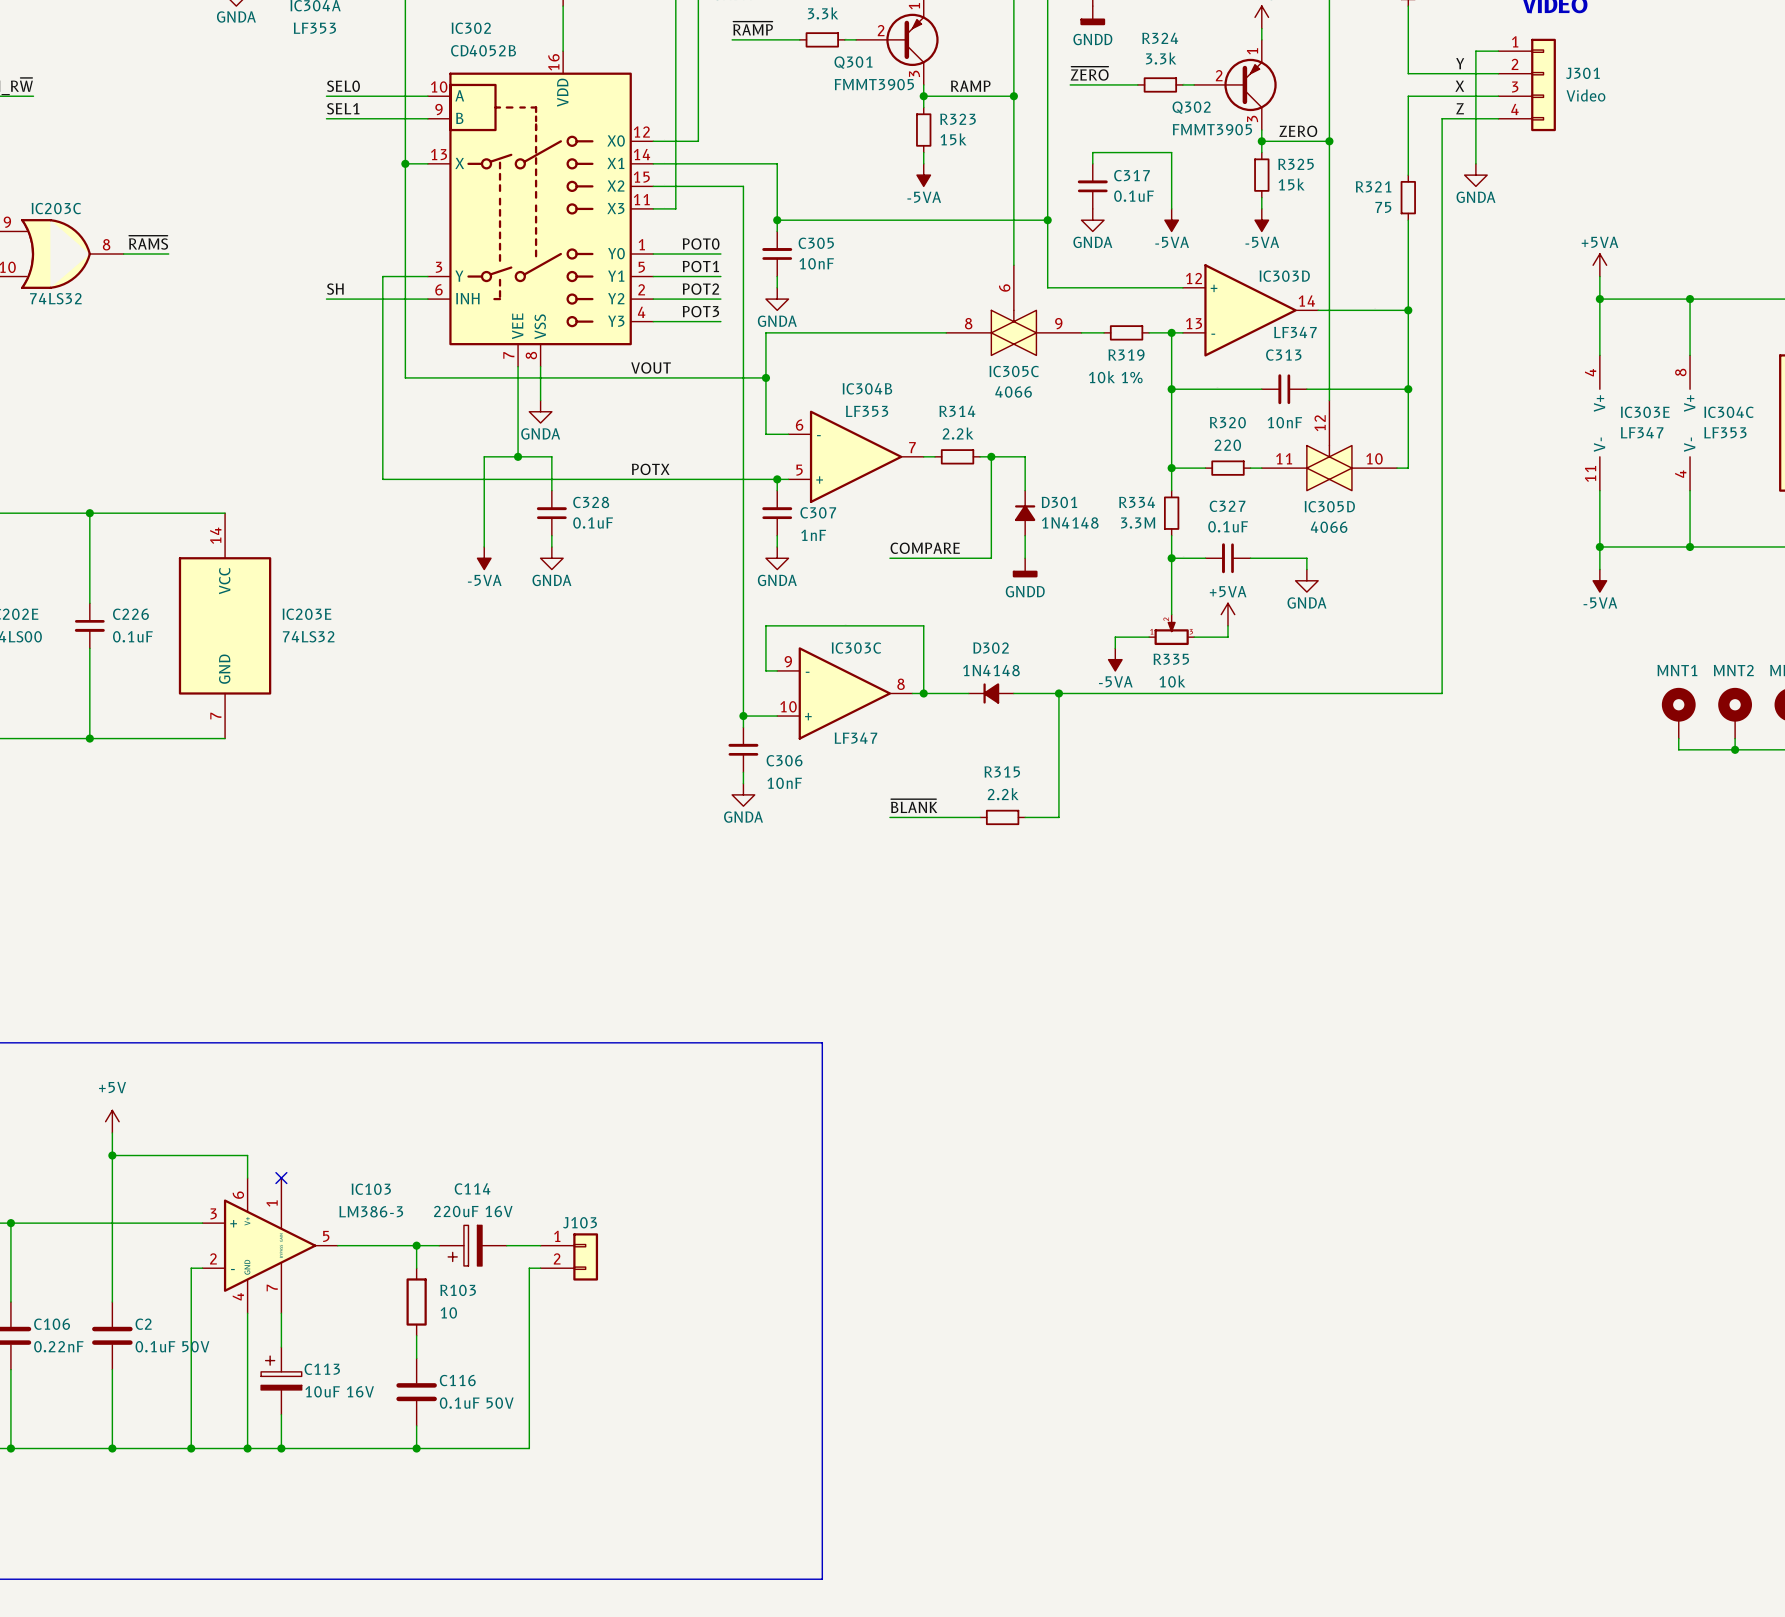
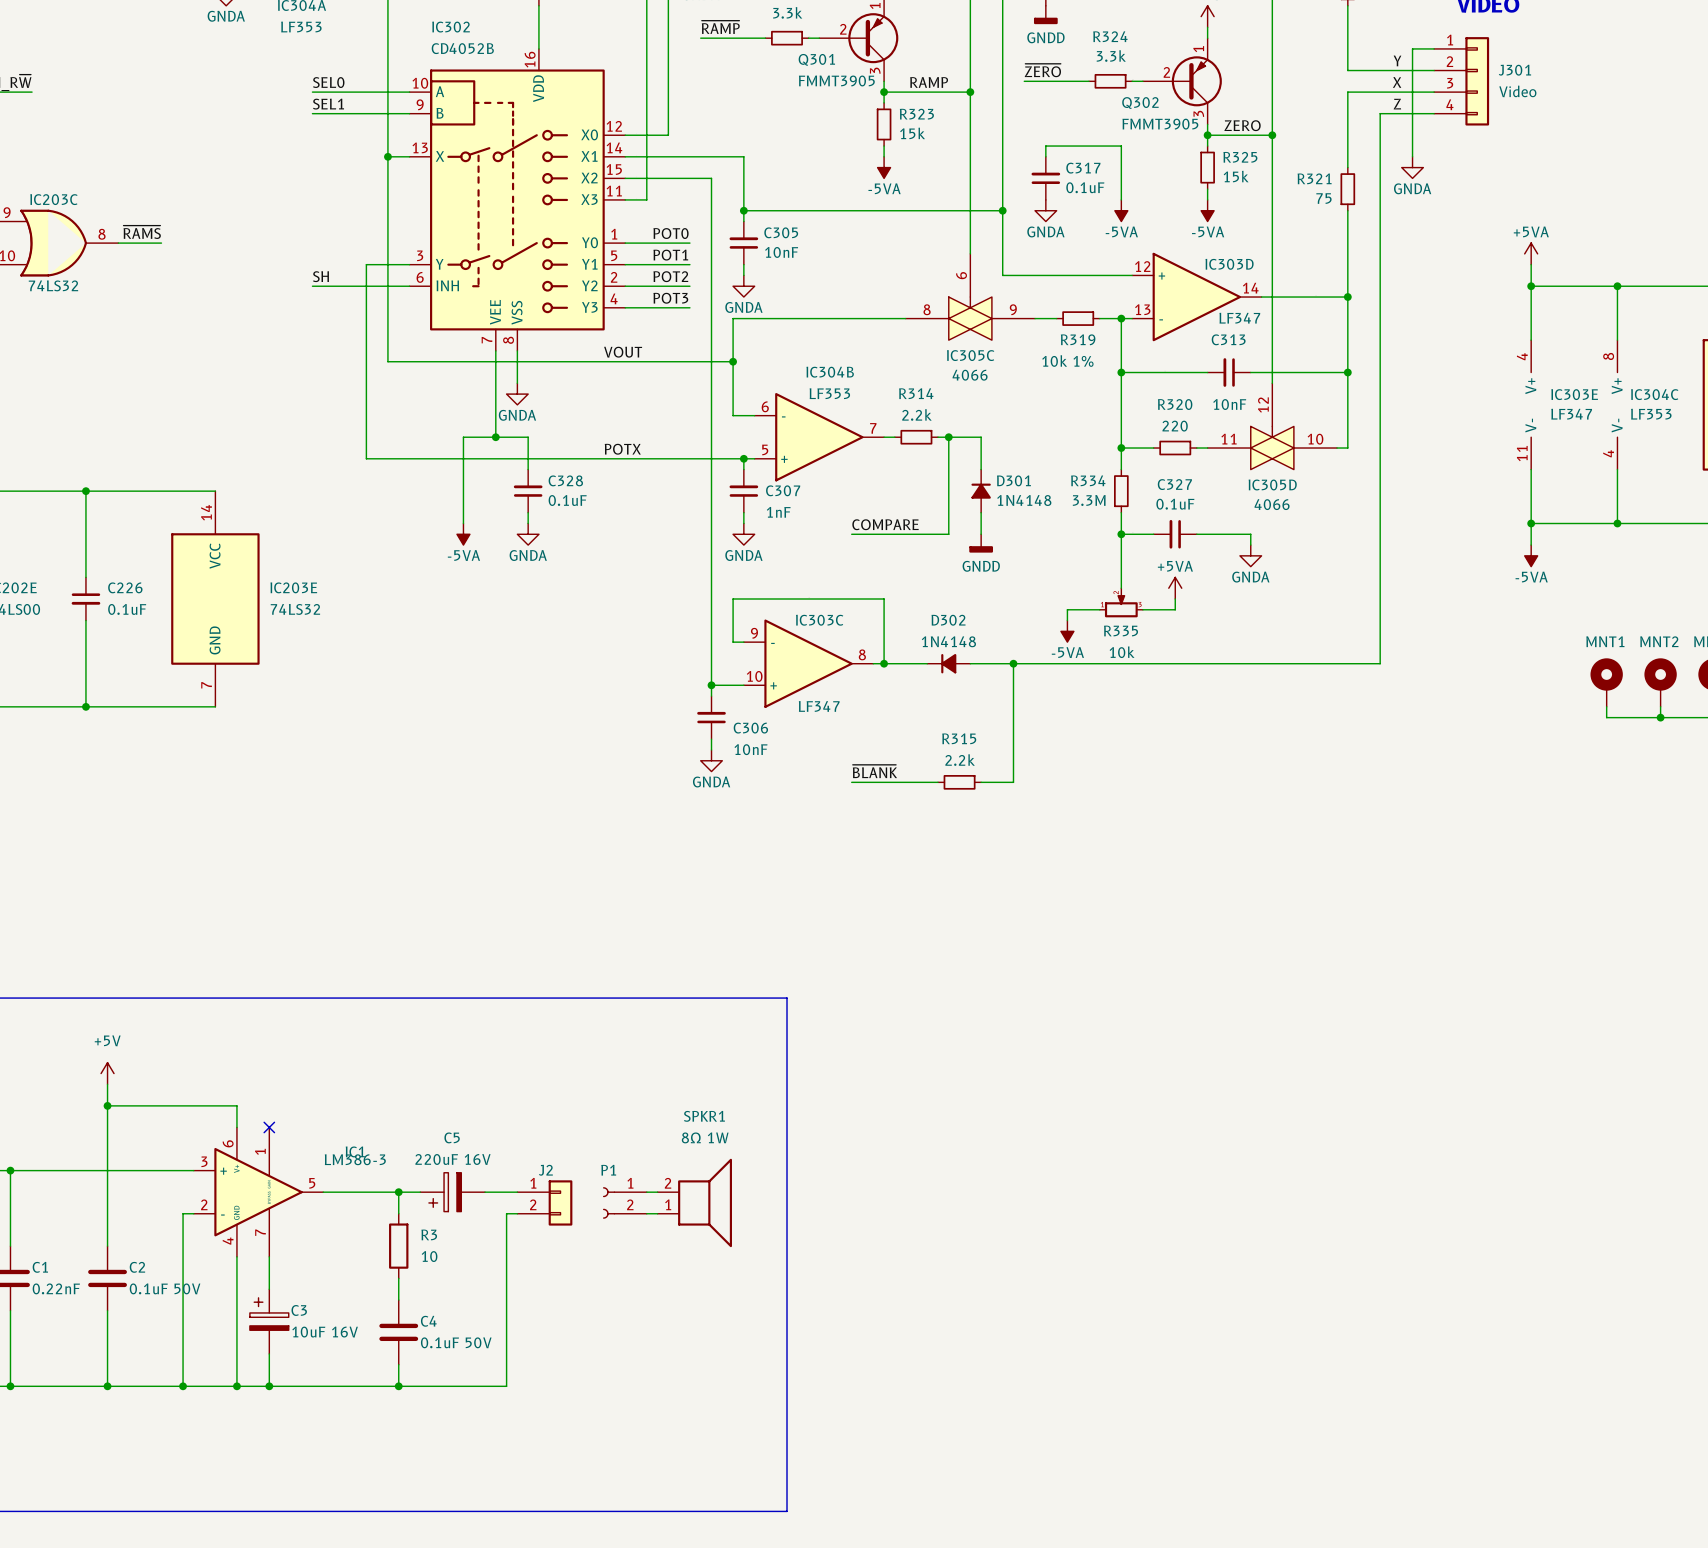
C114 name: C114 (472, 1188) -> C5 (452, 1137)
IC103 name: IC103 (371, 1189) -> IC1 (355, 1151)
J103 name: J103 (580, 1222) -> J2 (545, 1170)
wire: none -> (646, 1192) (657, 1192)
P1: none -> (624, 1202)
SPKR1: none -> 8Ω 1W (694, 1202)
wire: none -> (646, 1213) (657, 1213)
R103 name: R103 (458, 1290) -> R3 (429, 1234)
C106 name: C106 (52, 1324) -> C1 (40, 1267)
C113 name: C113 (322, 1369) -> C3 (299, 1310)
C116 name: C116 (457, 1380) -> C4 (428, 1321)

